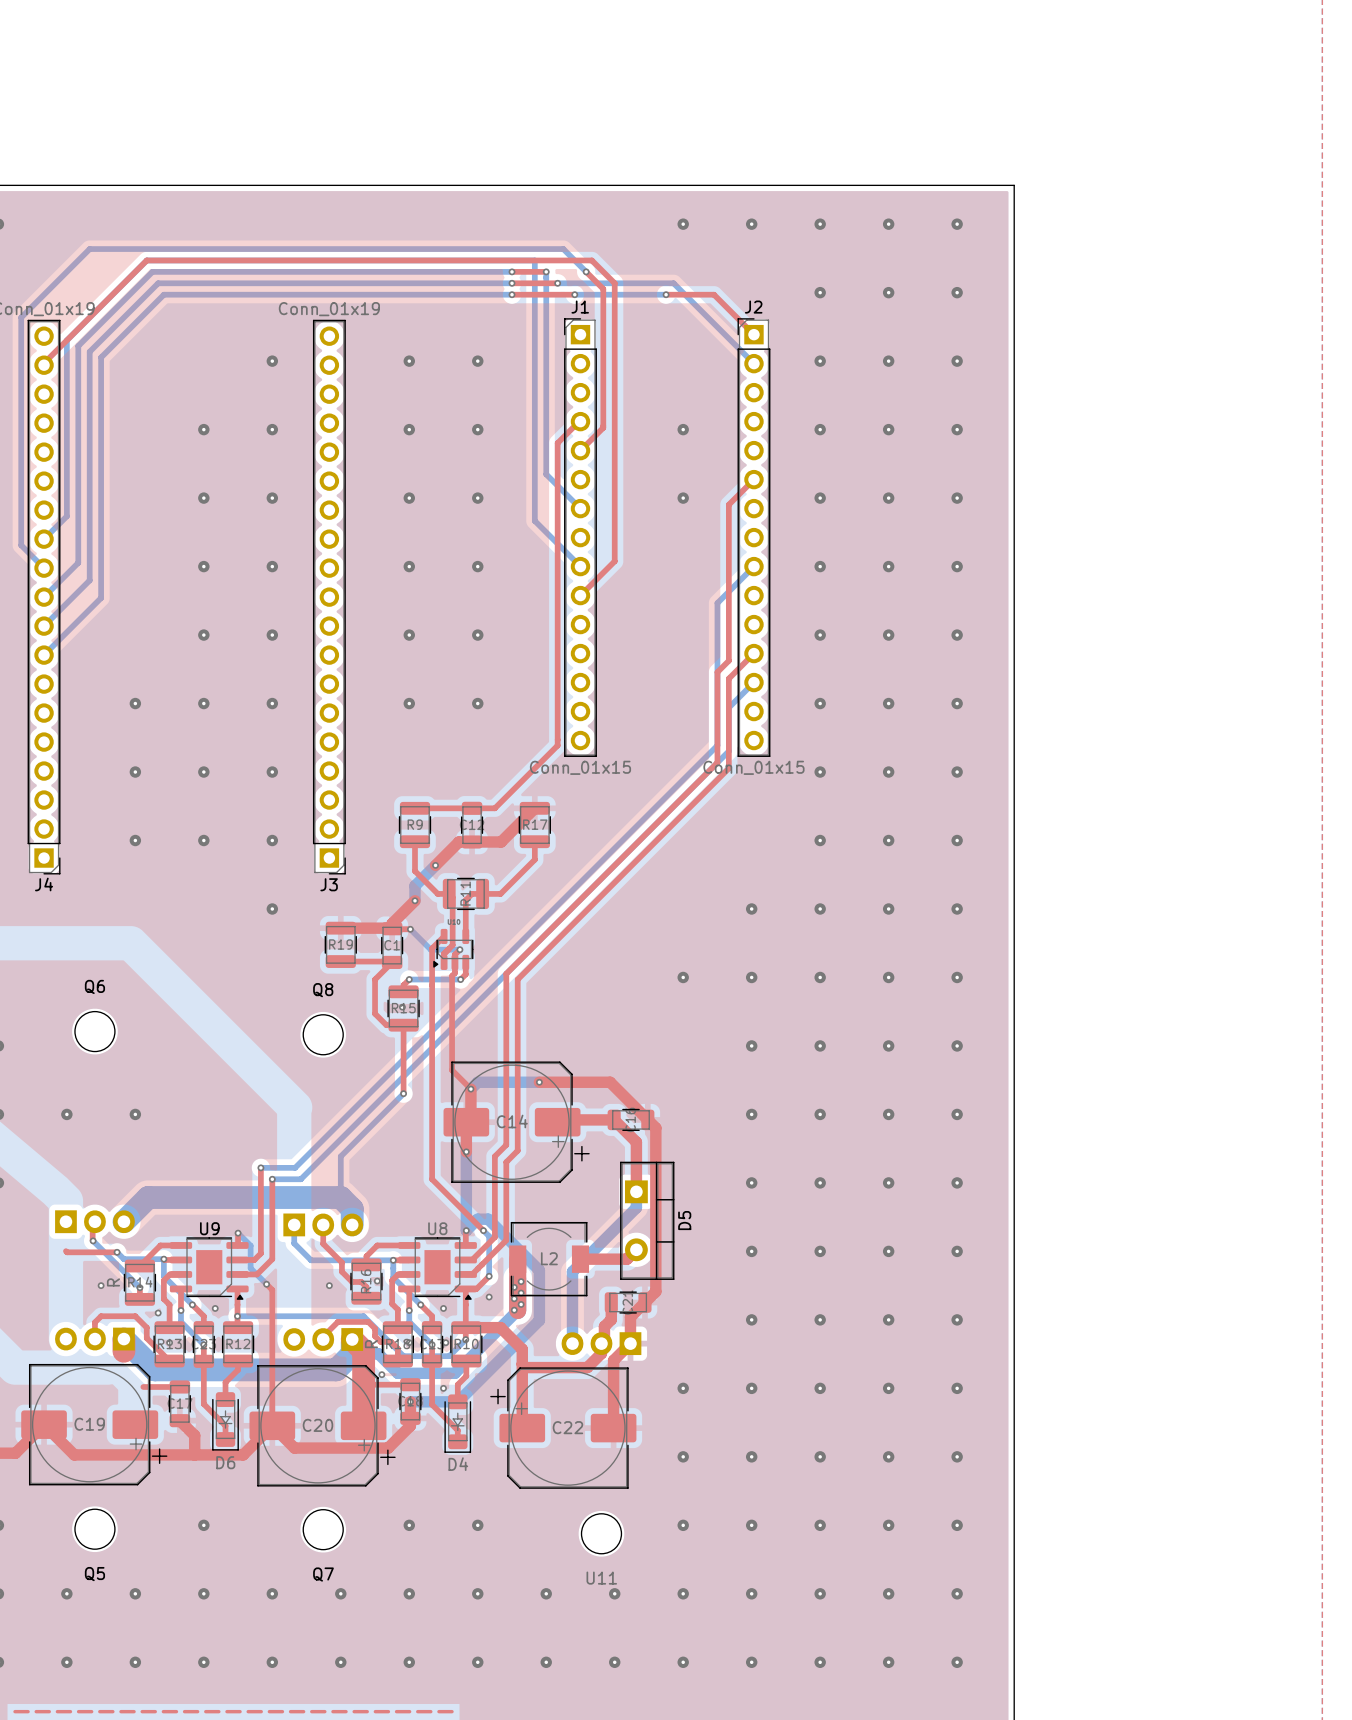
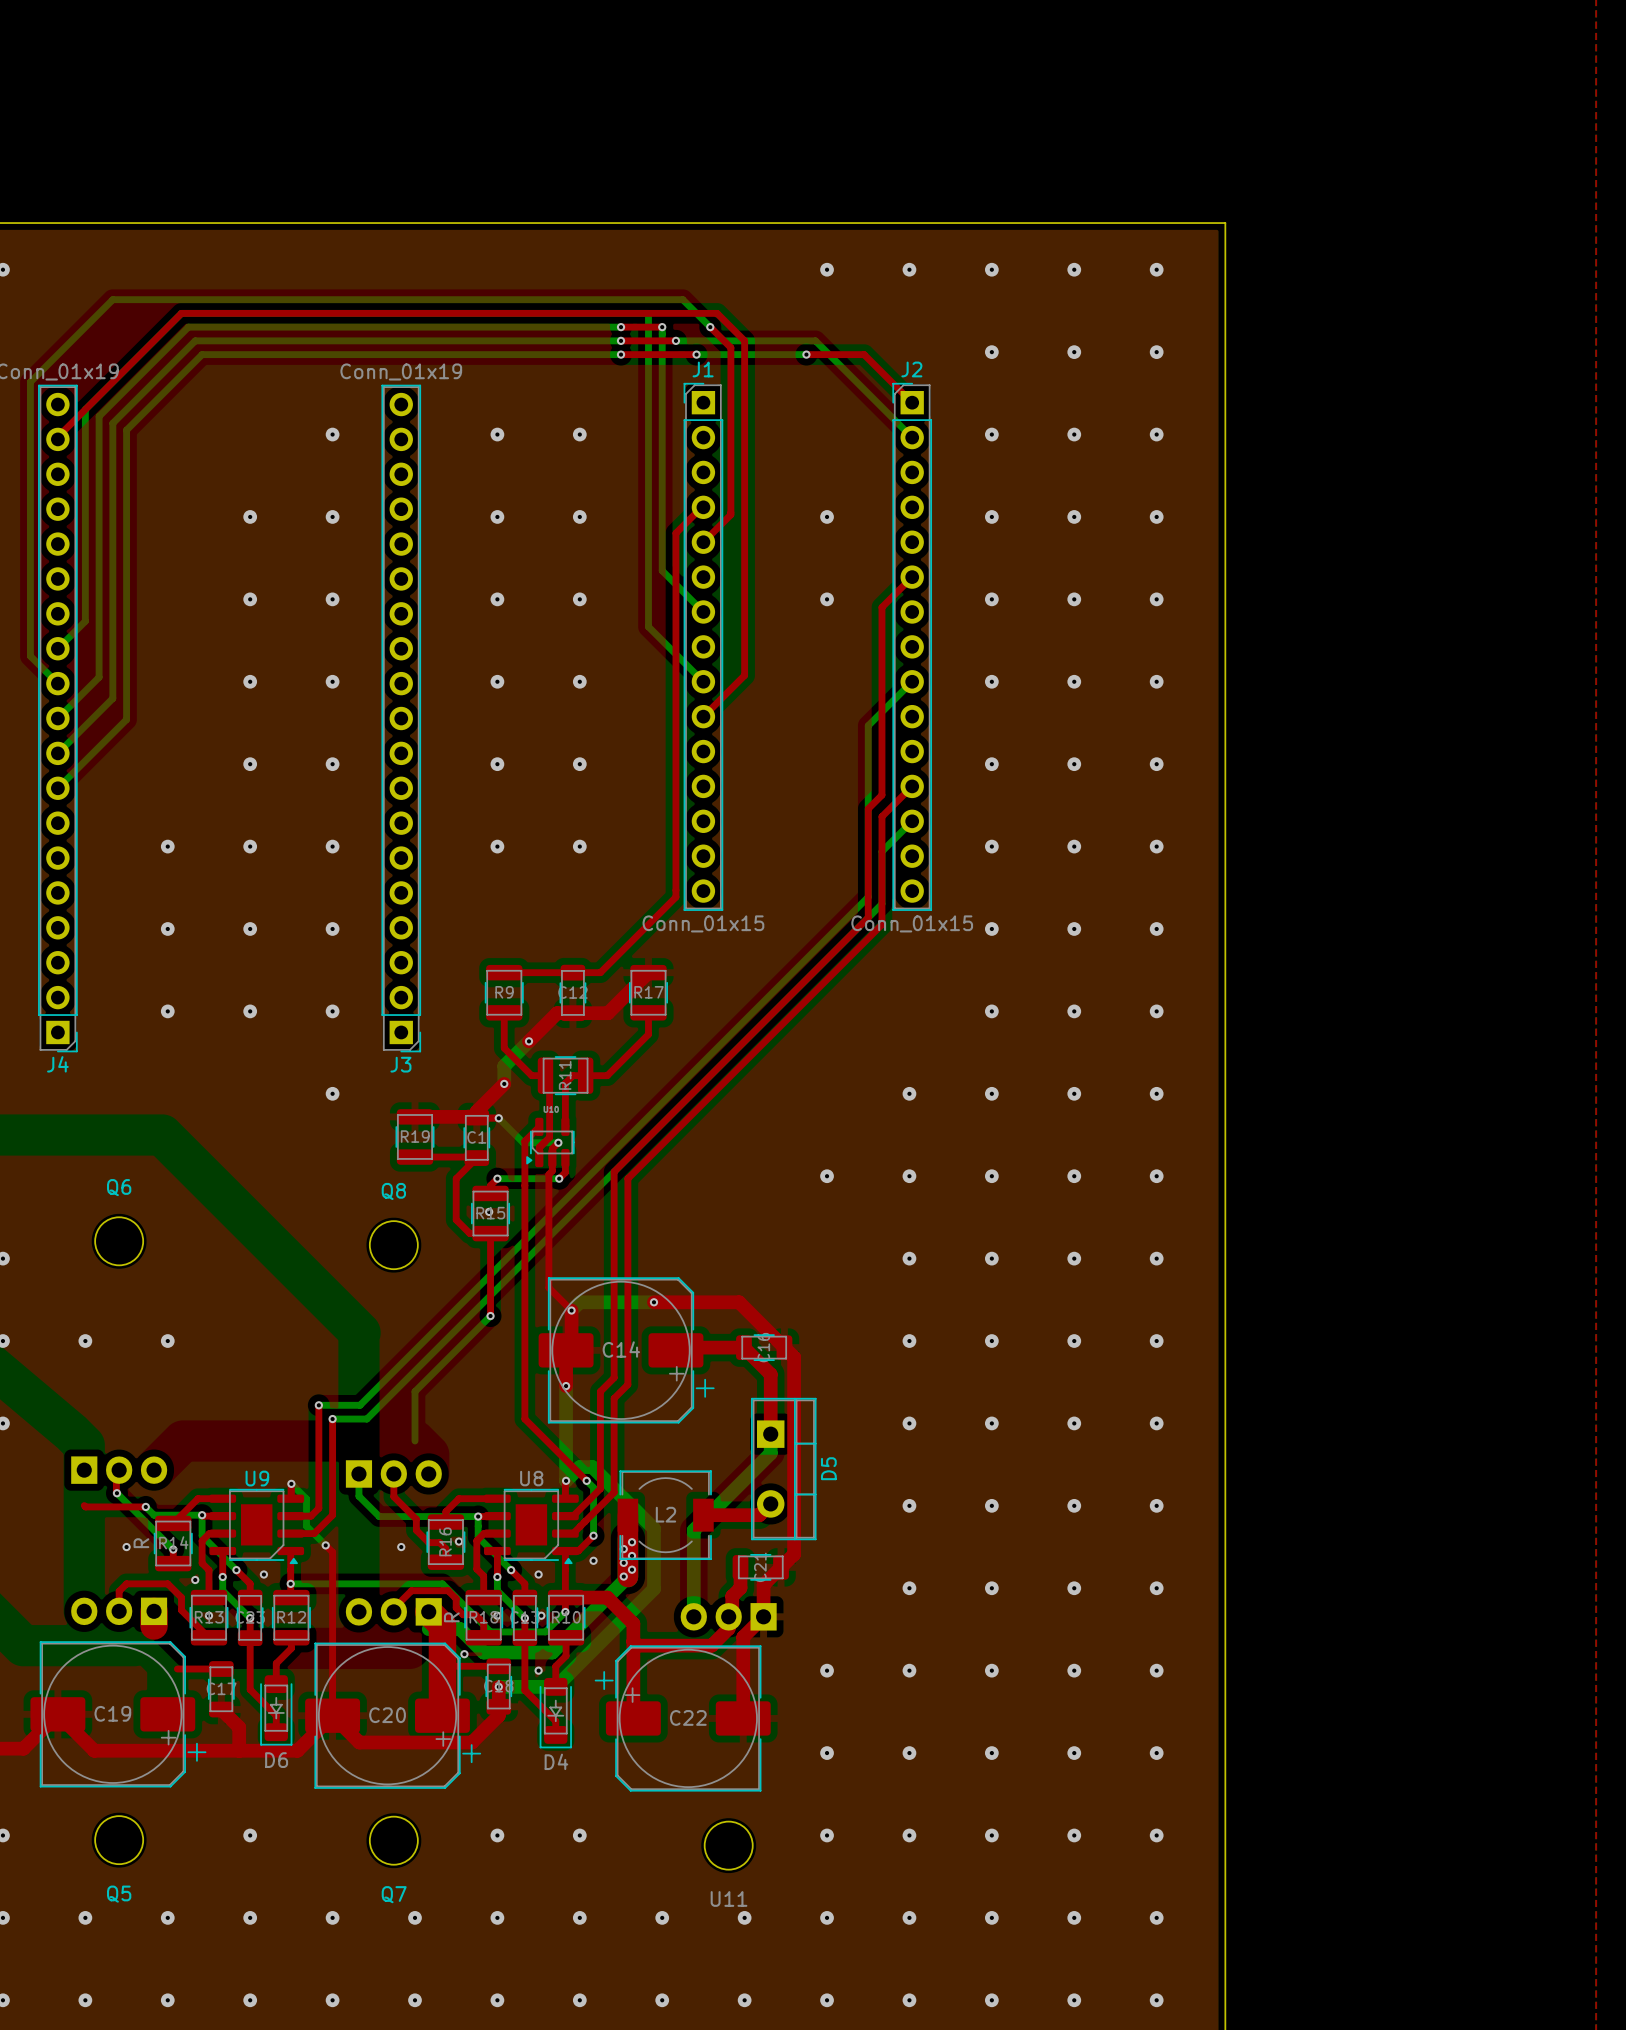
bottom track: (123, 1221) (148, 1197) (340, 1197) (352, 1208) (352, 1224) -> none
bottom track: (123, 1339) (154, 1369) (336, 1369) (352, 1353) (352, 1342) -> none

